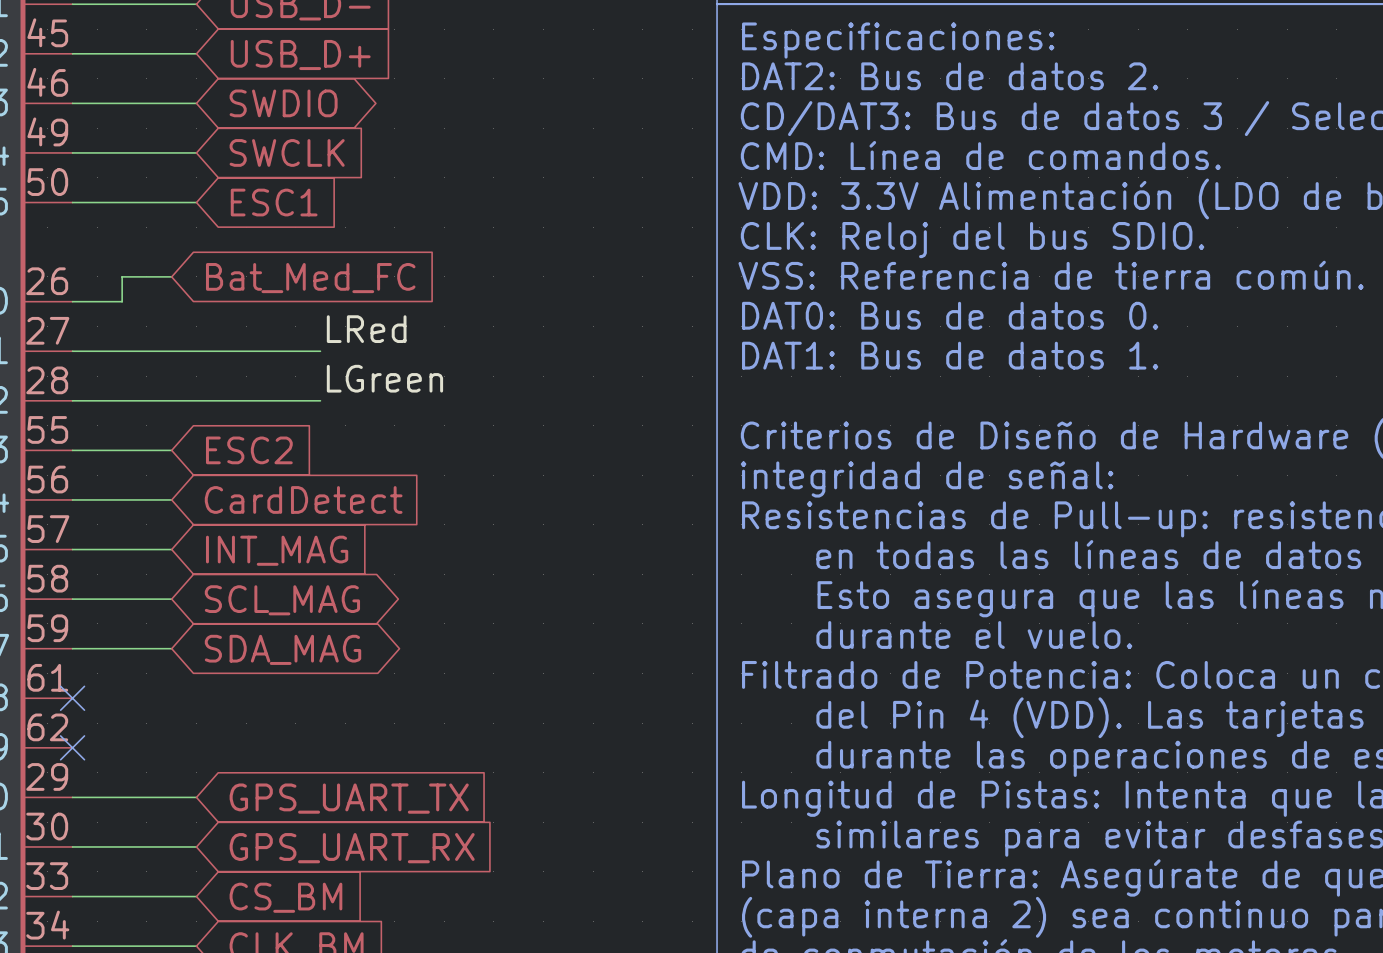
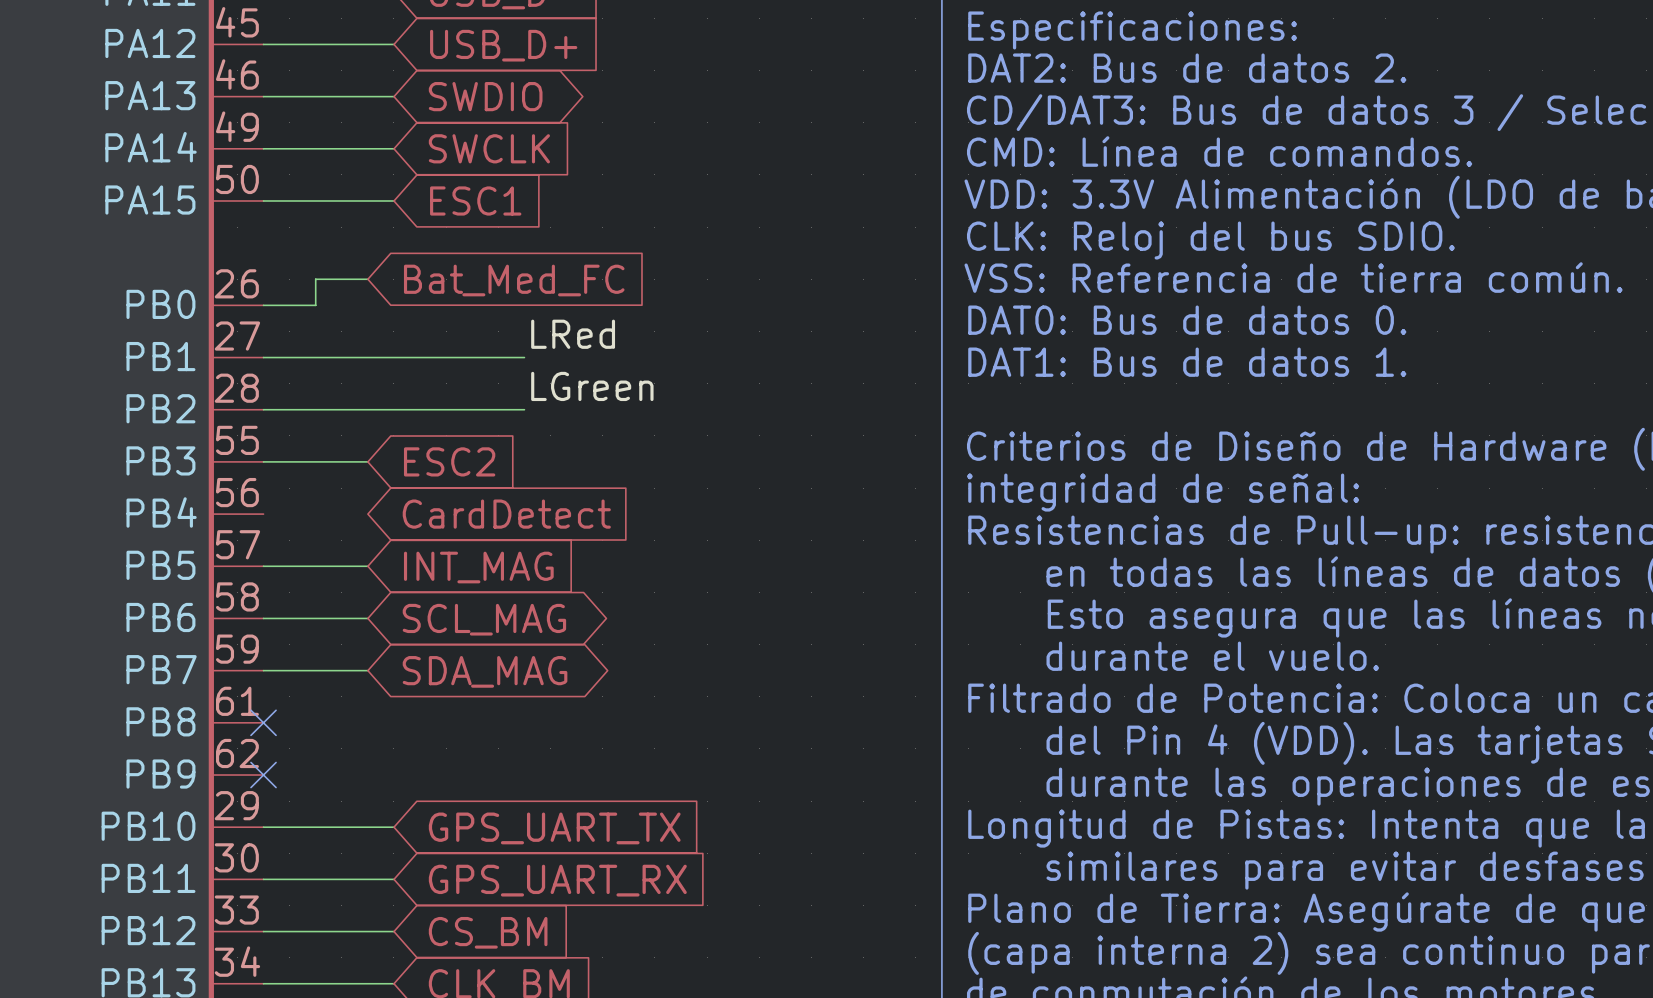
wire: (72, 499) (171, 499) -> none

